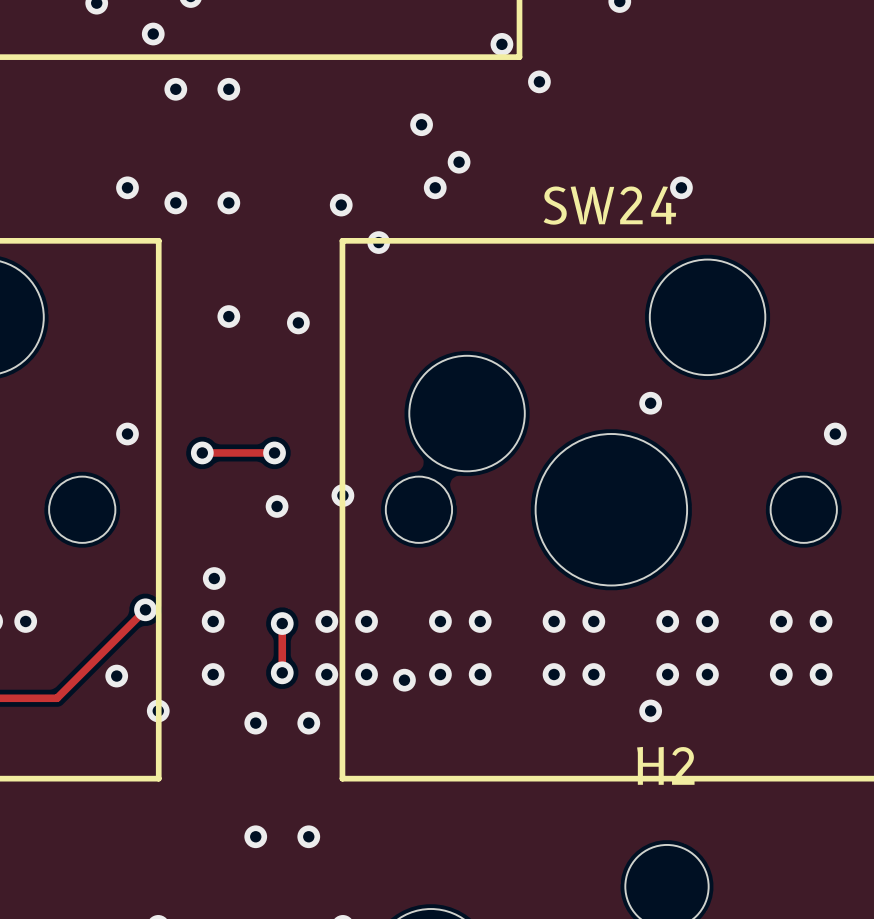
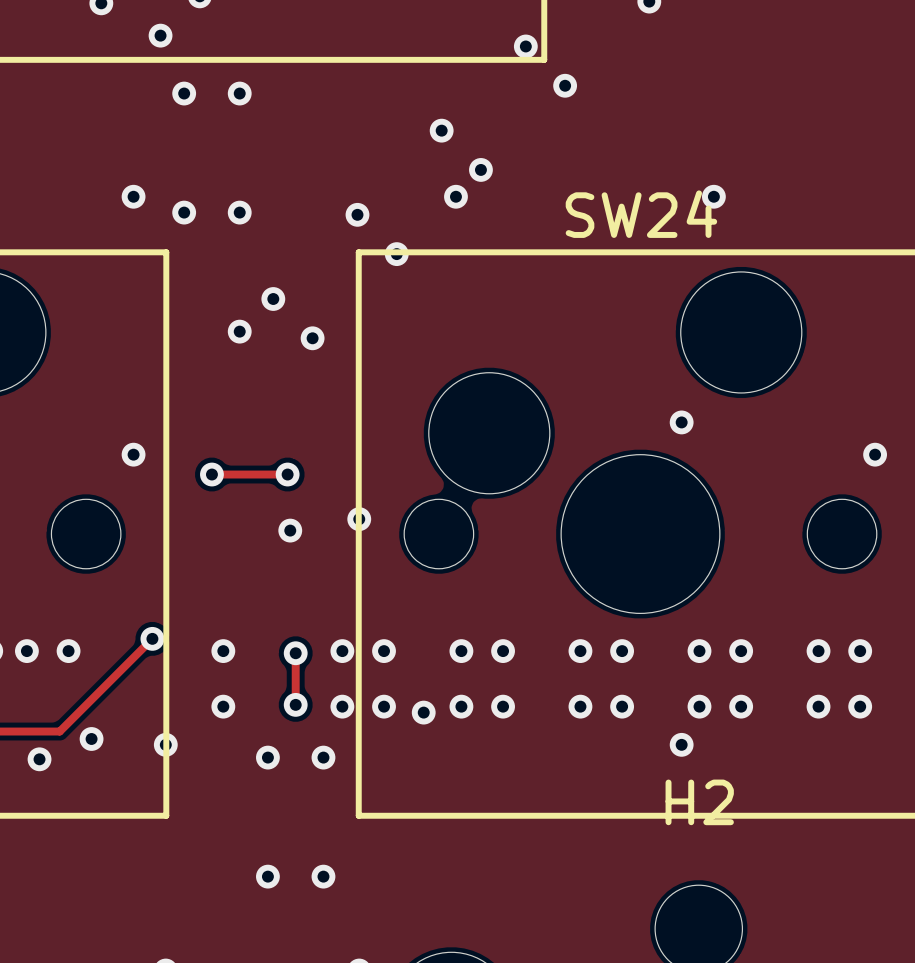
via: none -> (273, 299)
via: (214, 578) -> none
via: none -> (68, 651)
via: (116, 676) -> none
via: none -> (91, 738)
via: none -> (39, 759)

